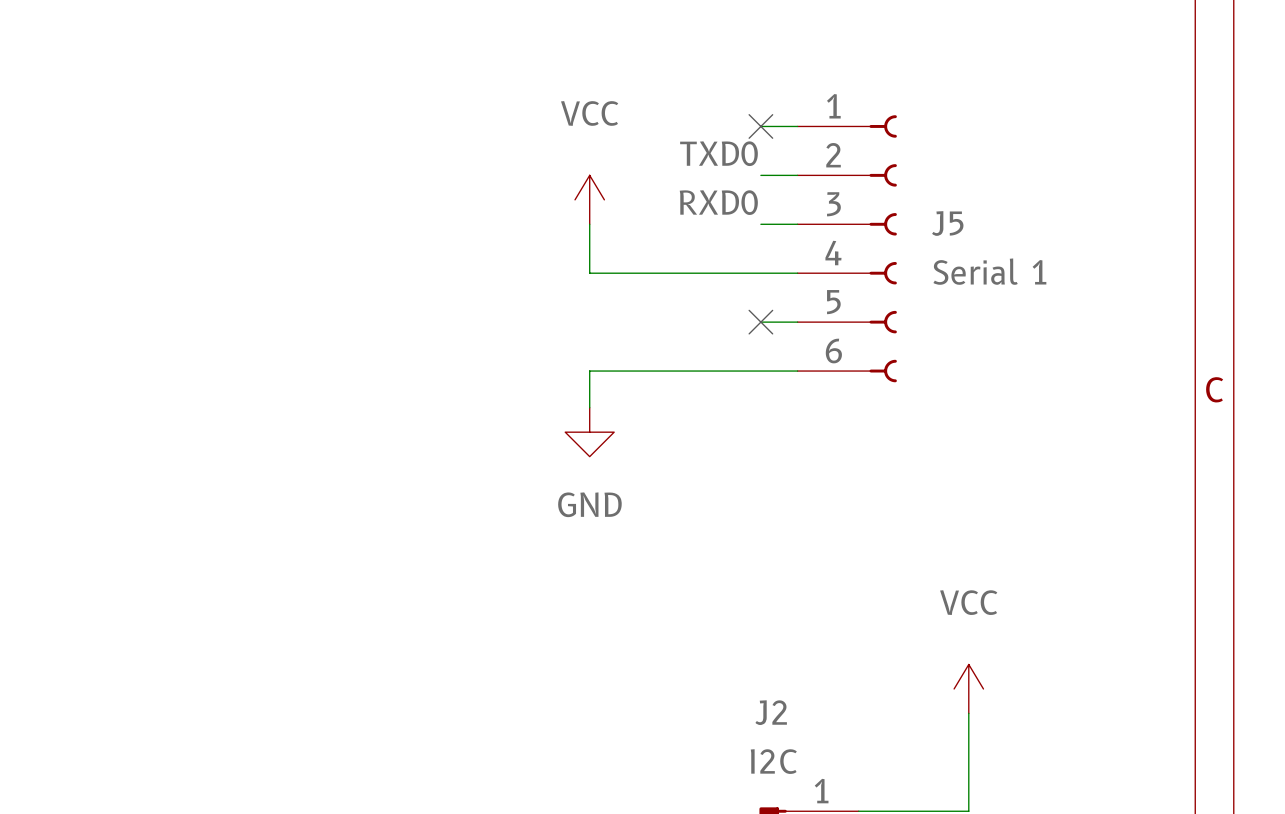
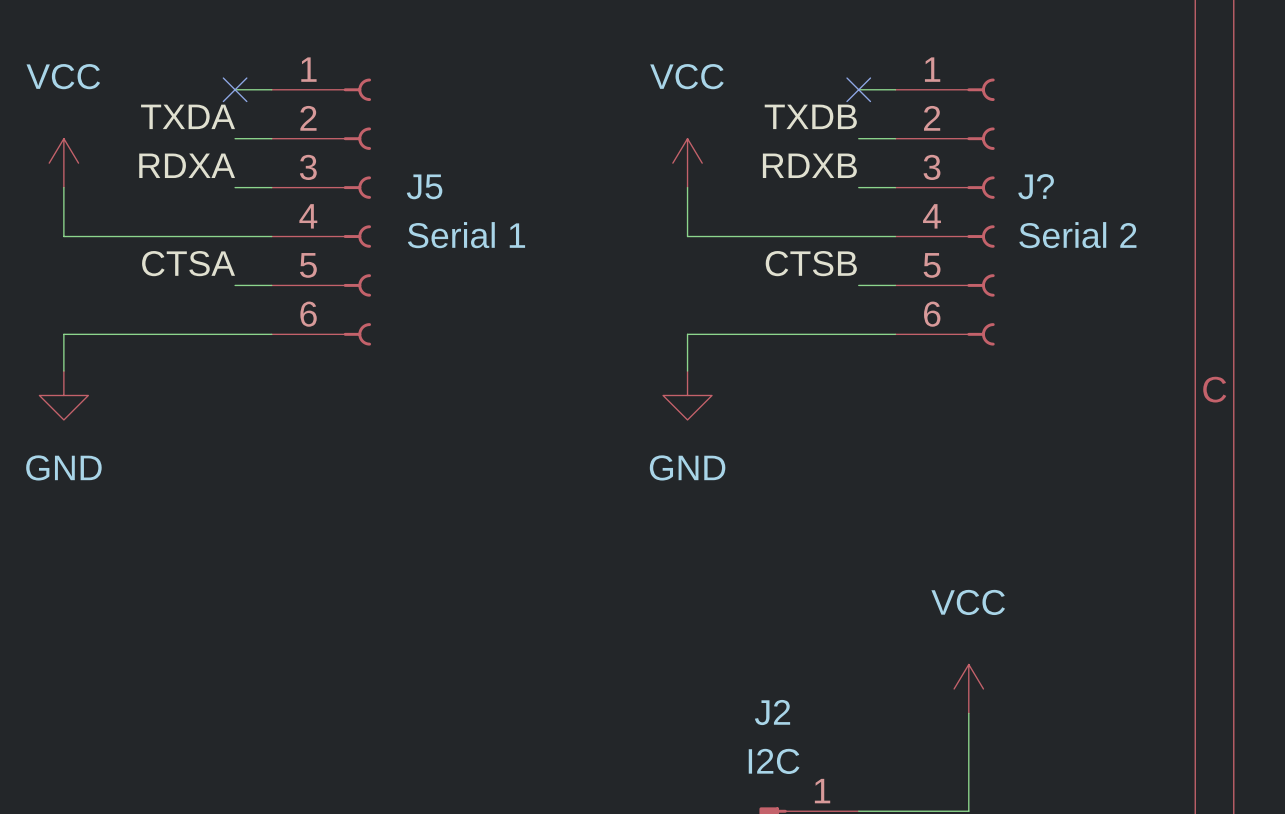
wire: none -> (235, 89) (271, 89)
no-connect mark: none -> (235, 89)
label: none -> TXDA (188, 116)
wire: (760, 126) (797, 126) -> (858, 89) (895, 89)
no-connect mark position: (760, 126) -> (858, 89)
wire: none -> (235, 138) (271, 138)
label: TXD0 (718, 153) -> TXDB (810, 116)
power symbol: none -> VCC (63, 163)
label: none -> RDXA (187, 165)
label: none -> RDXB (809, 165)
wire: (760, 175) (797, 175) -> (858, 138) (895, 138)
wire: none -> (63, 187) (63, 236) (271, 236)
wire: none -> (235, 187) (271, 187)
power symbol position: VCC (589, 199) -> VCC (687, 163)
label: RXD0 (718, 202) -> none
J?: none -> Serial 2 (945, 212)
wire: (589, 224) (589, 273) (797, 273) -> (687, 187) (687, 236) (895, 236)
wire: (760, 224) (797, 224) -> (858, 187) (895, 187)
J5 position: (847, 248) -> (321, 212)
label: none -> CTSA (188, 263)
label: none -> CTSB (811, 263)
wire: none -> (235, 285) (271, 285)
wire: (760, 322) (797, 322) -> (858, 285) (895, 285)
no-connect mark: (760, 322) -> none
wire: none -> (271, 334) (63, 334) (63, 371)
wire: (797, 371) (589, 371) (589, 407) -> (895, 334) (687, 334) (687, 371)
power symbol: none -> GND (63, 395)
power symbol position: GND (589, 432) -> GND (687, 395)

